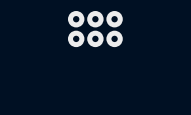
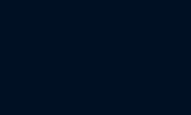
via: (76, 19) -> none
via: (95, 19) -> none
via: (114, 19) -> none
via: (76, 38) -> none
via: (95, 38) -> none
via: (114, 38) -> none

